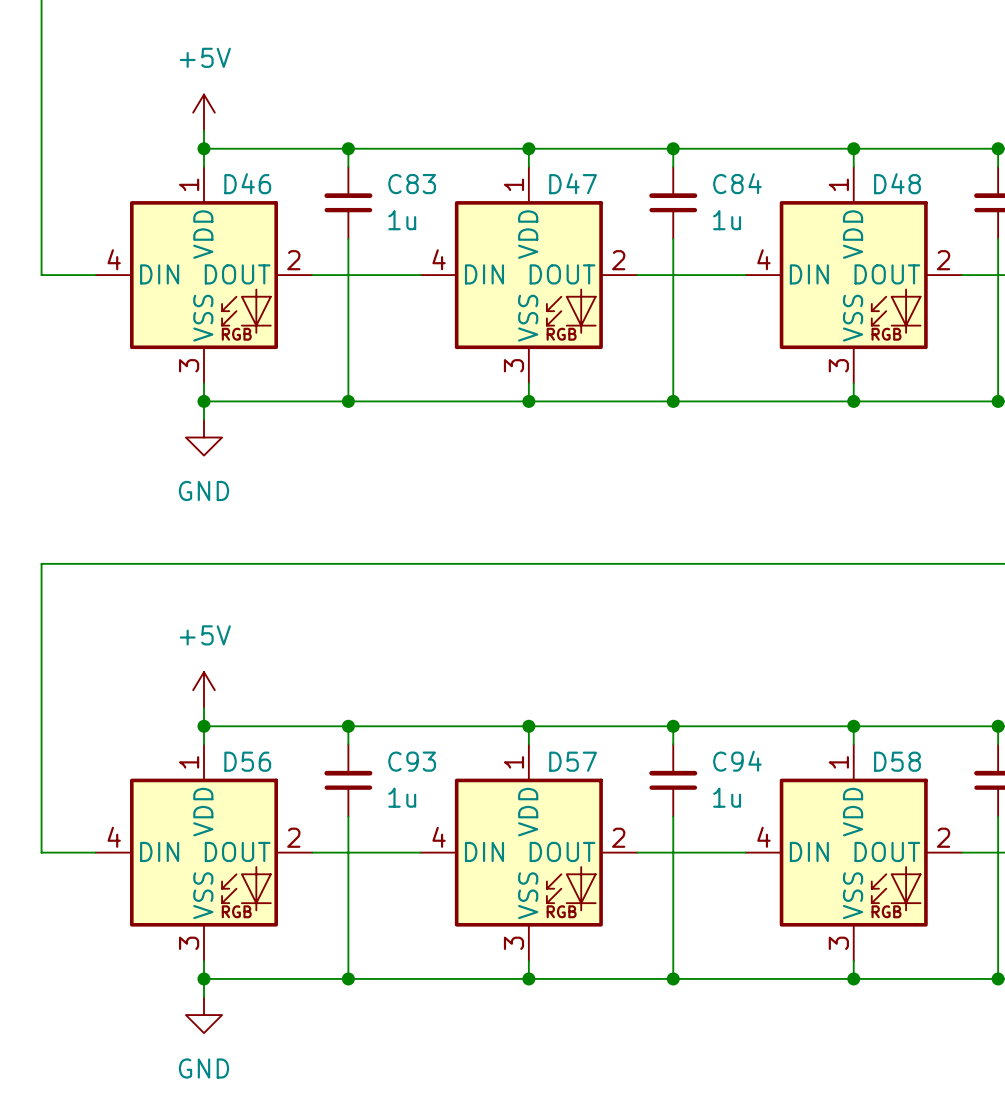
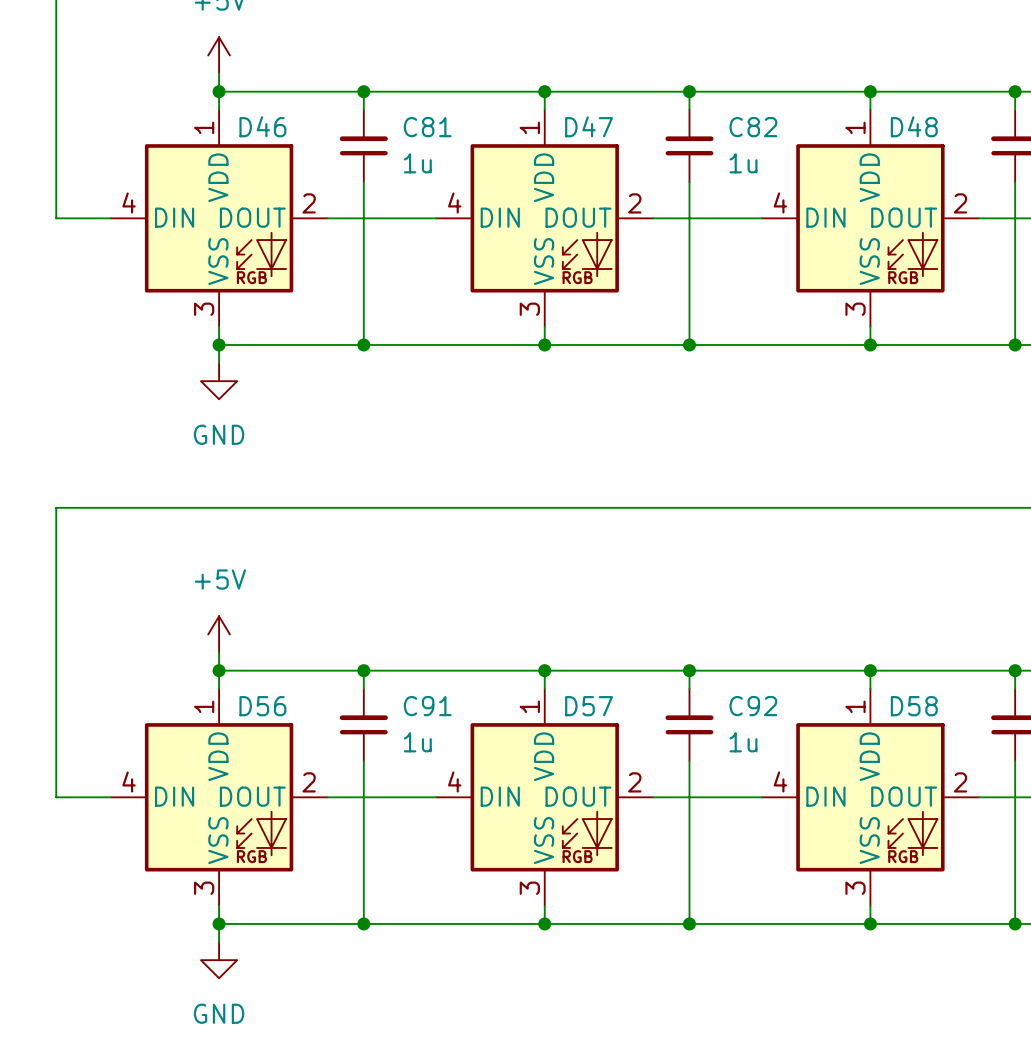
C84 name: C84 (737, 183) -> C82 (753, 127)
C83 name: C83 (412, 184) -> C81 (427, 127)
C93 name: C93 (412, 761) -> C91 (427, 706)
C94 name: C94 (737, 761) -> C92 (753, 706)

